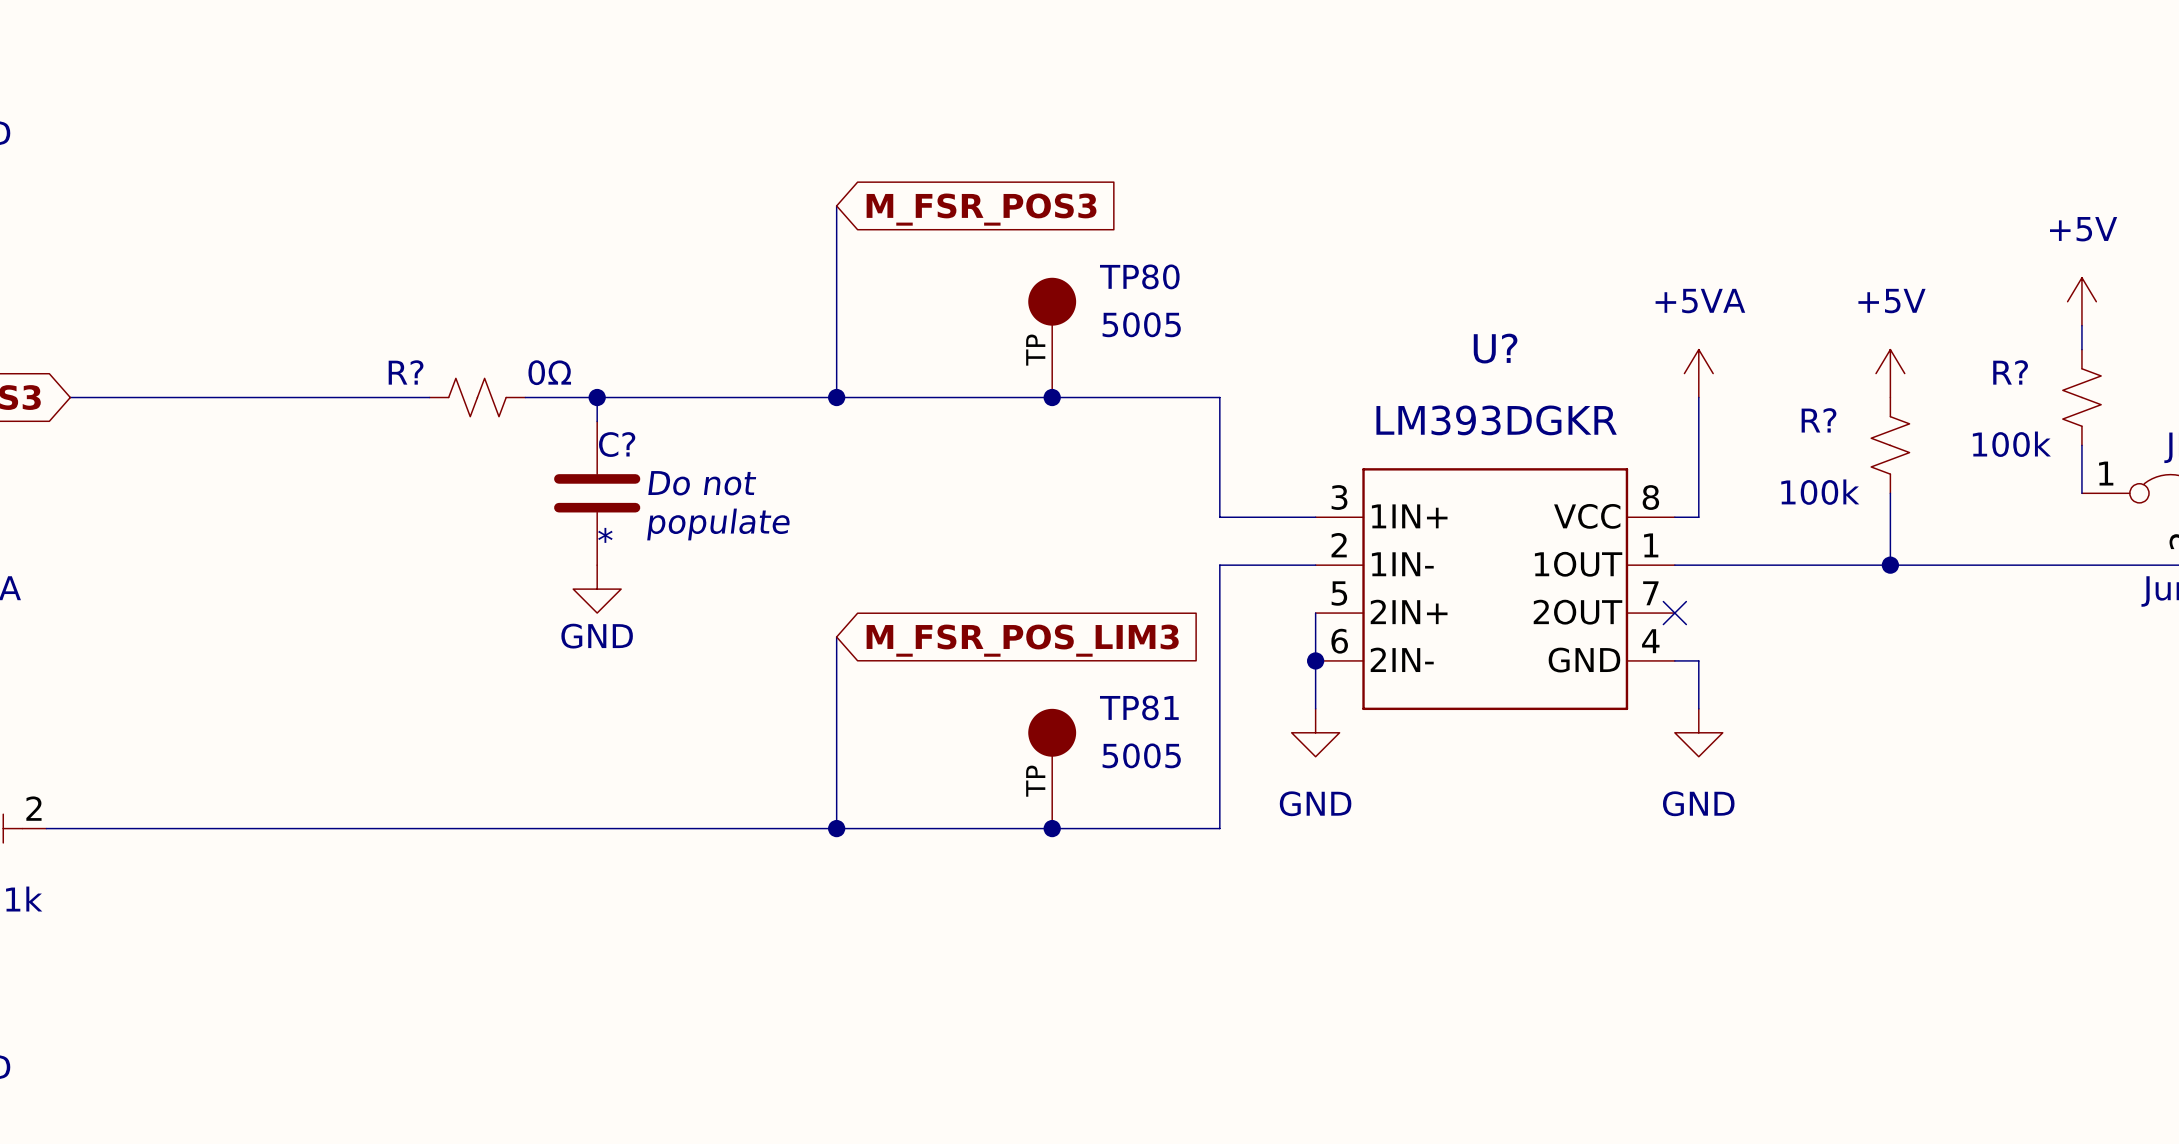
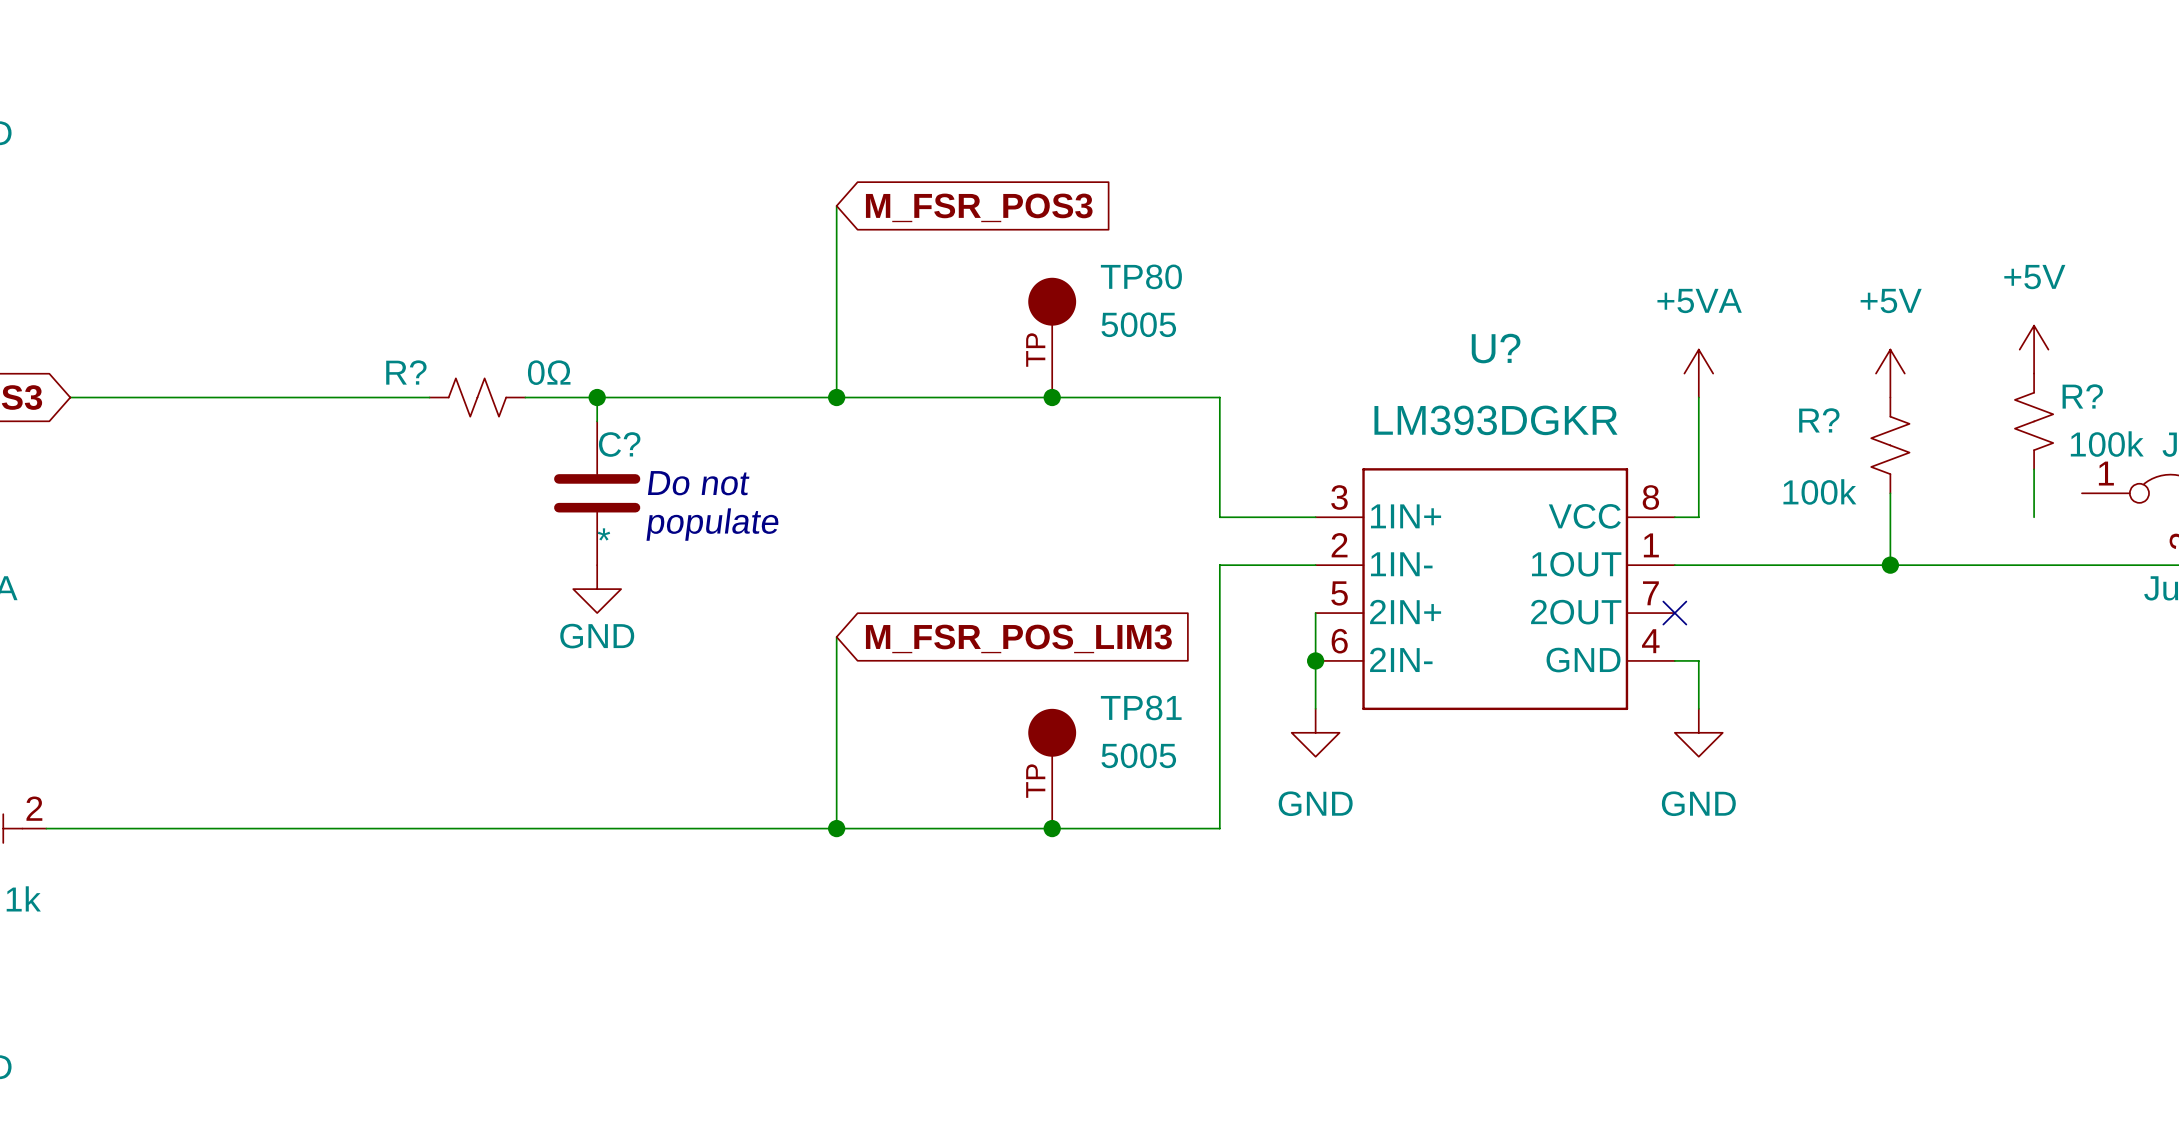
power symbol position: +5V (2081, 301) -> +5V (2034, 349)
wire: (2081, 325) (2081, 349) -> none
R?: 100k (2081, 397) -> none
R?: none -> 100k (2034, 421)
wire: (2081, 445) (2081, 493) -> (2034, 469) (2034, 517)

